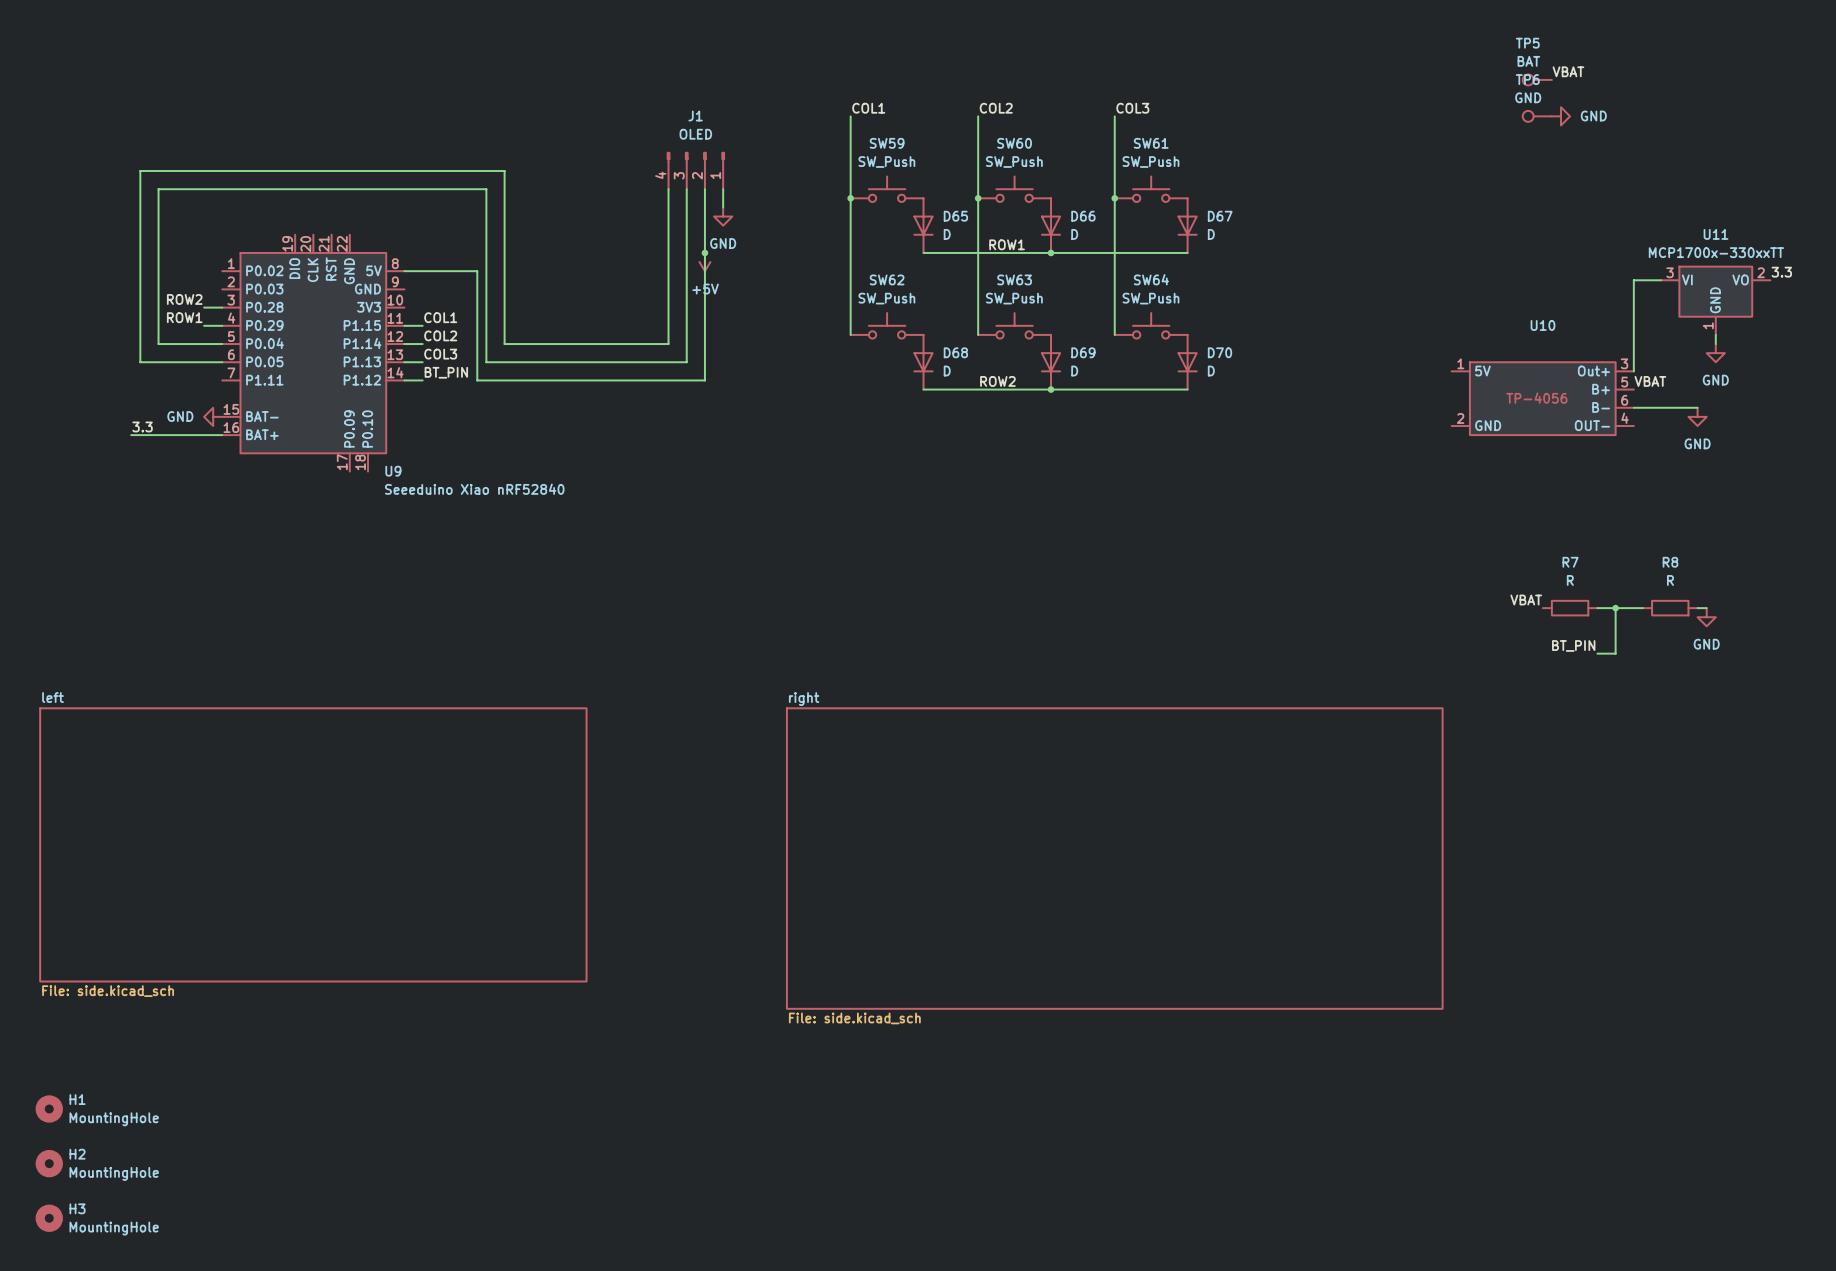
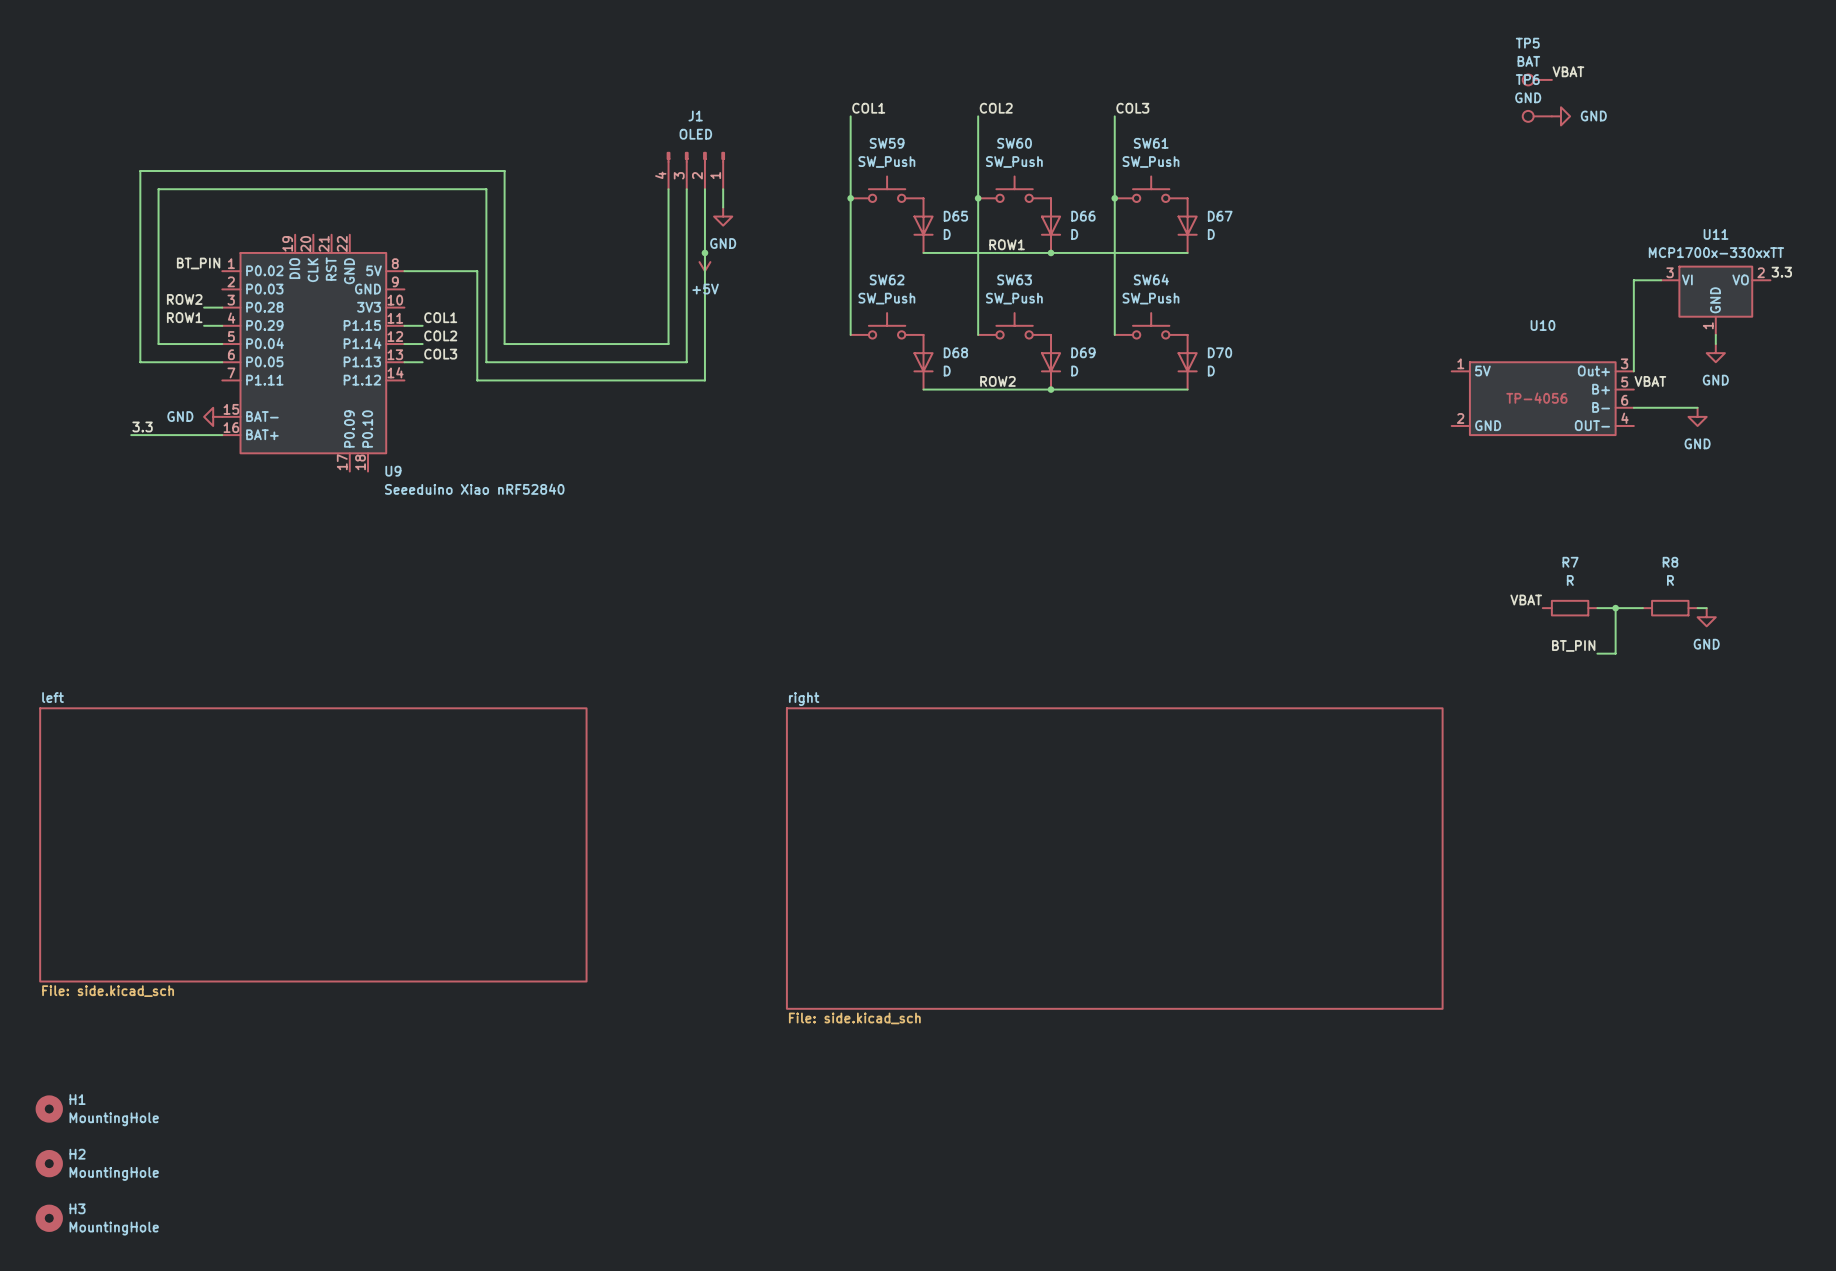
label: none -> BT_PIN (198, 263)
label: BT_PIN (446, 372) -> none
wire: (404, 380) (422, 380) -> none

